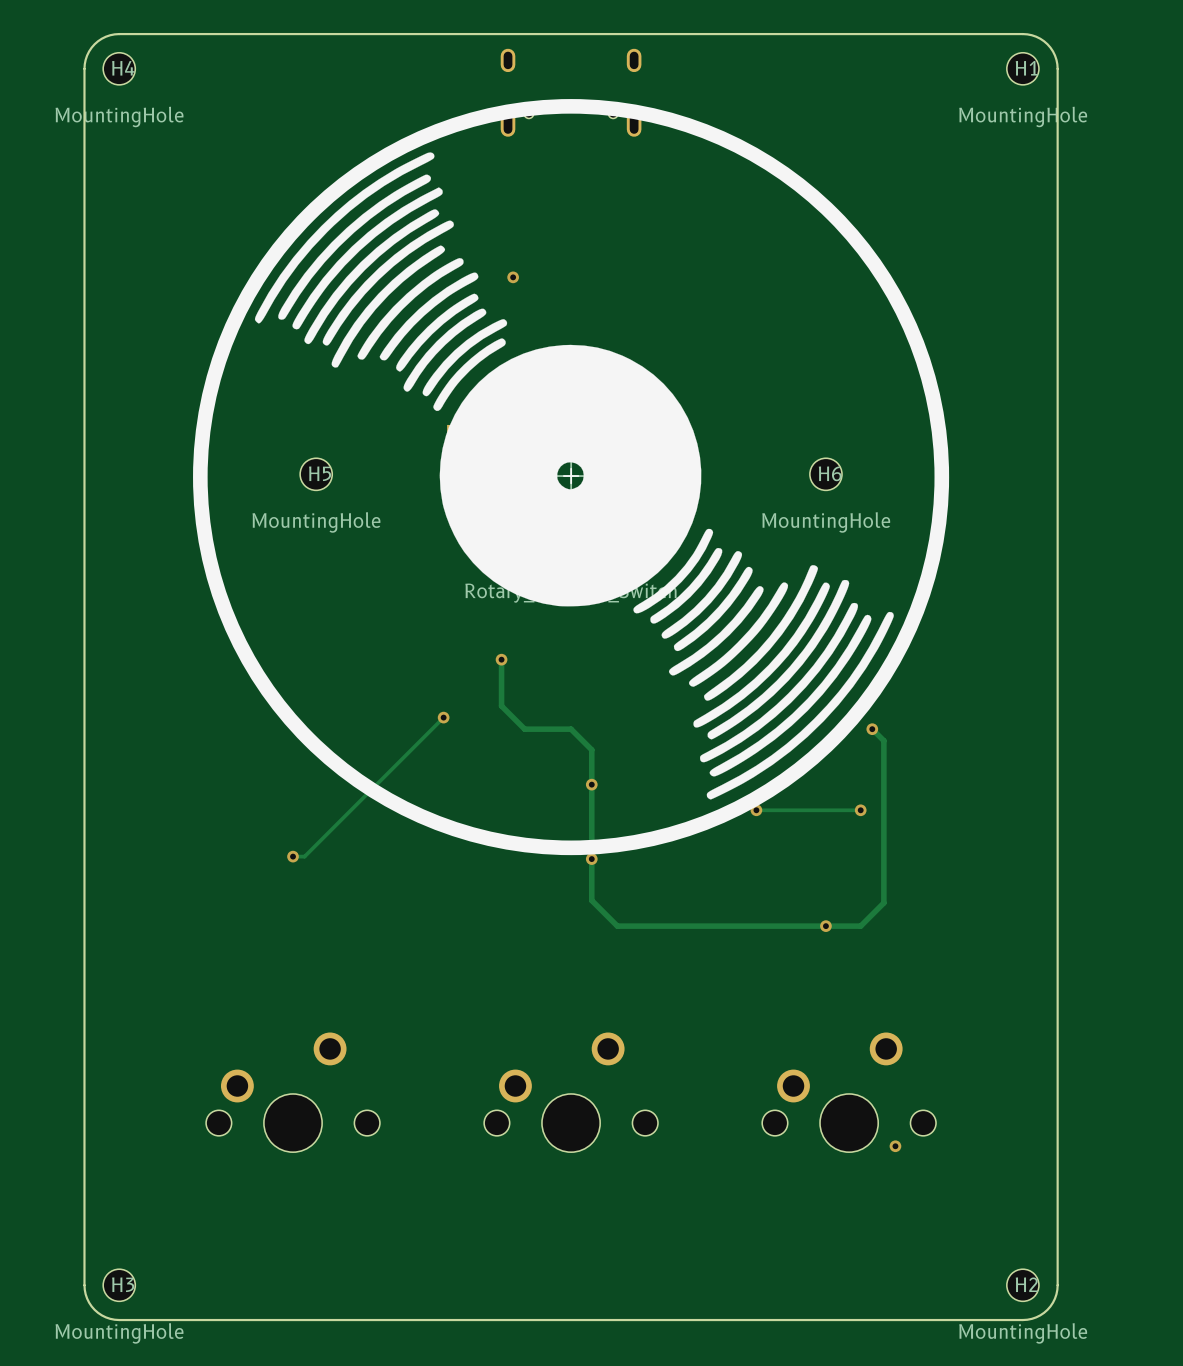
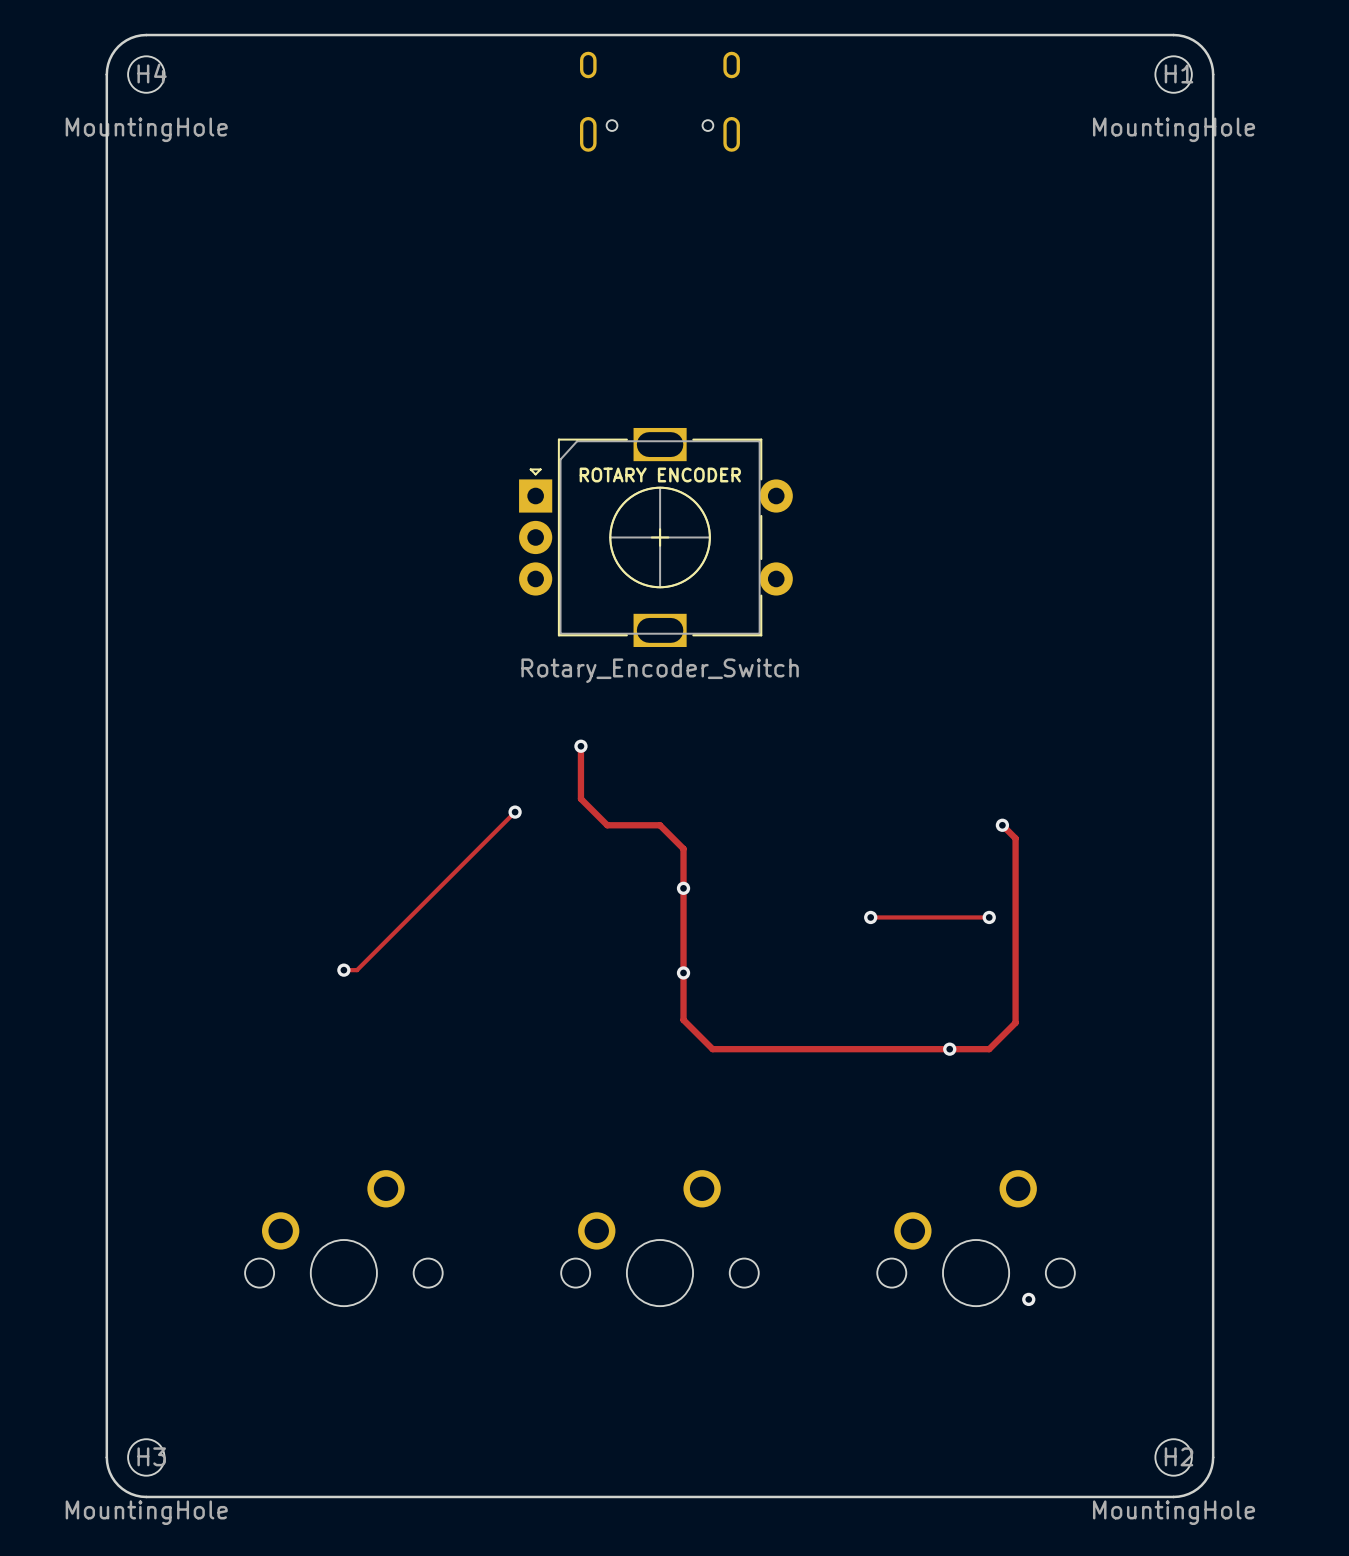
drawing: [193, 99, 950, 856] -> none
via: (513, 277) -> none
H5: MountingHole (316, 474) -> none
H6: MountingHole (825, 474) -> none

